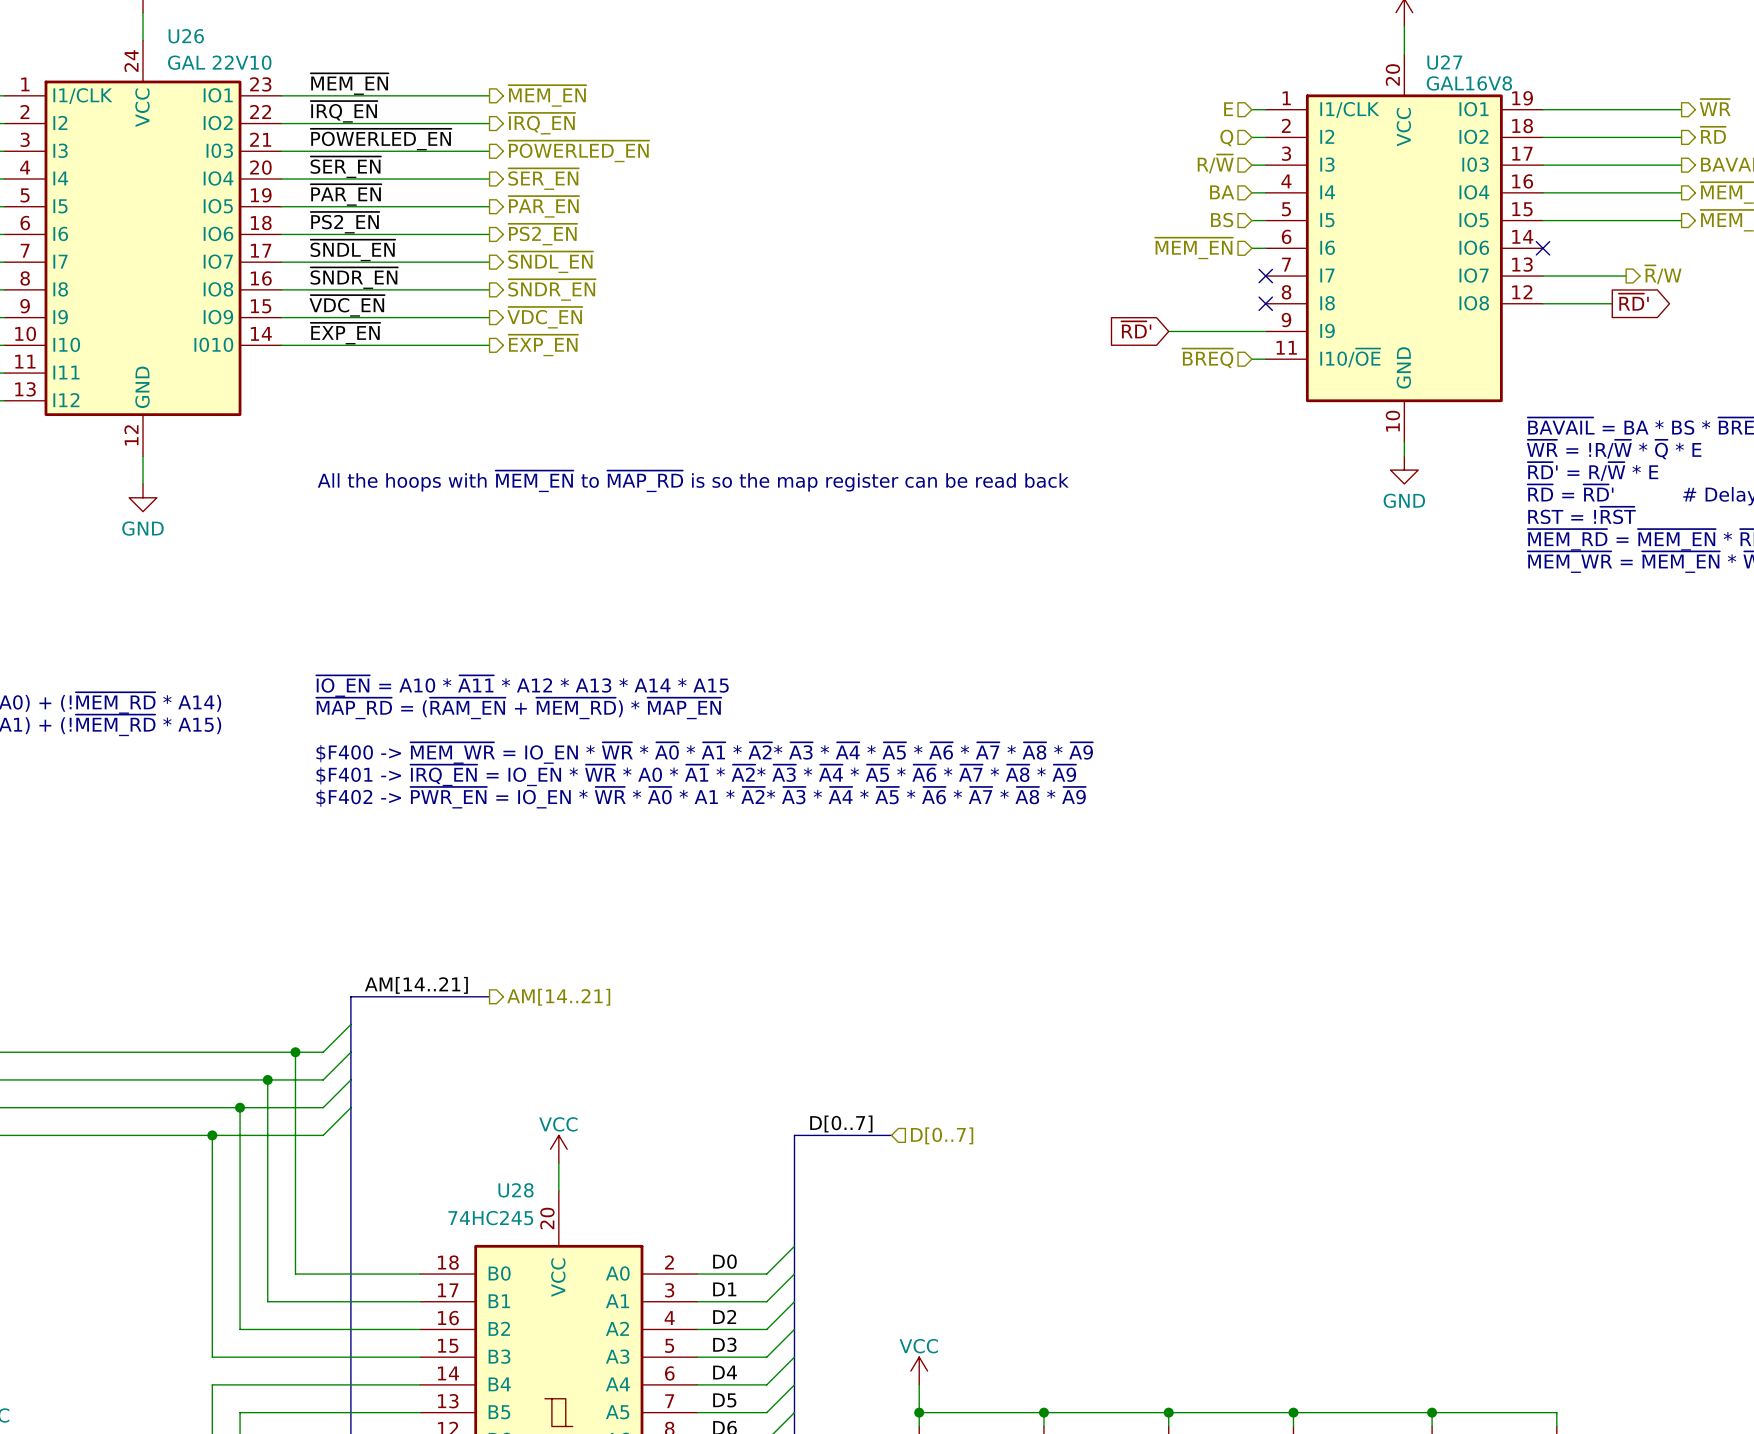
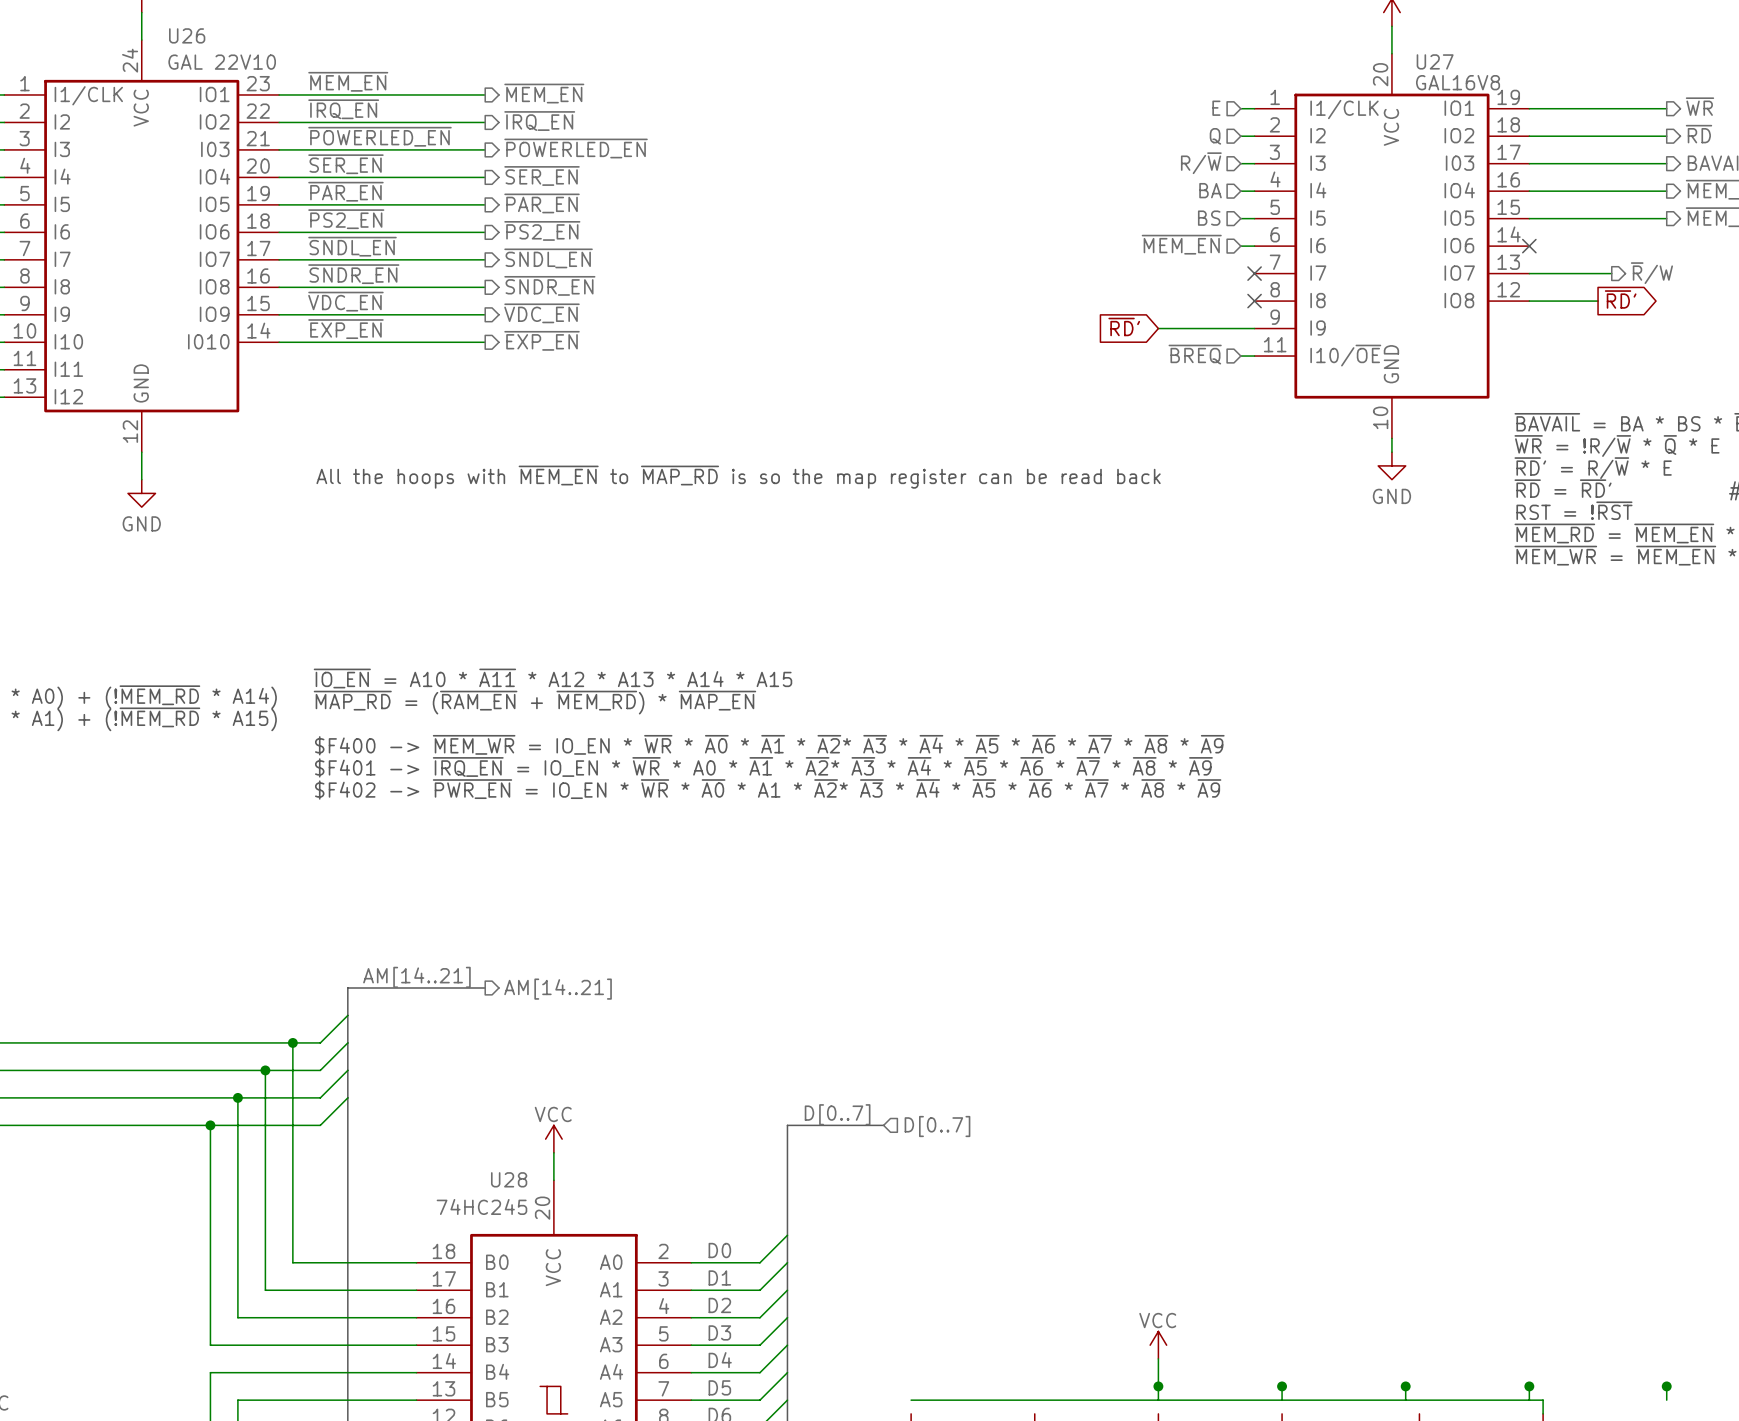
power symbol position: VCC (919, 1371) -> VCC (1158, 1345)
wire: (919, 1384) (919, 1426) -> none
wire: none -> (1405, 1386) (1405, 1400)
wire: none -> (1529, 1386) (1529, 1400)
junction: none -> (1529, 1386)
junction: none -> (1666, 1386)
junction: (919, 1412) -> none
wire: (1043, 1412) (1043, 1426) -> none
junction: (1043, 1412) -> none
wire: (1168, 1412) (1168, 1426) -> (1158, 1400) (1158, 1358)
junction position: (1168, 1412) -> (1158, 1386)
wire: (1293, 1412) (1293, 1426) -> (1282, 1400) (1282, 1386)
junction position: (1293, 1412) -> (1282, 1386)
wire: (1432, 1412) (1432, 1426) -> (1666, 1386) (1666, 1400)
junction position: (1432, 1412) -> (1405, 1386)

